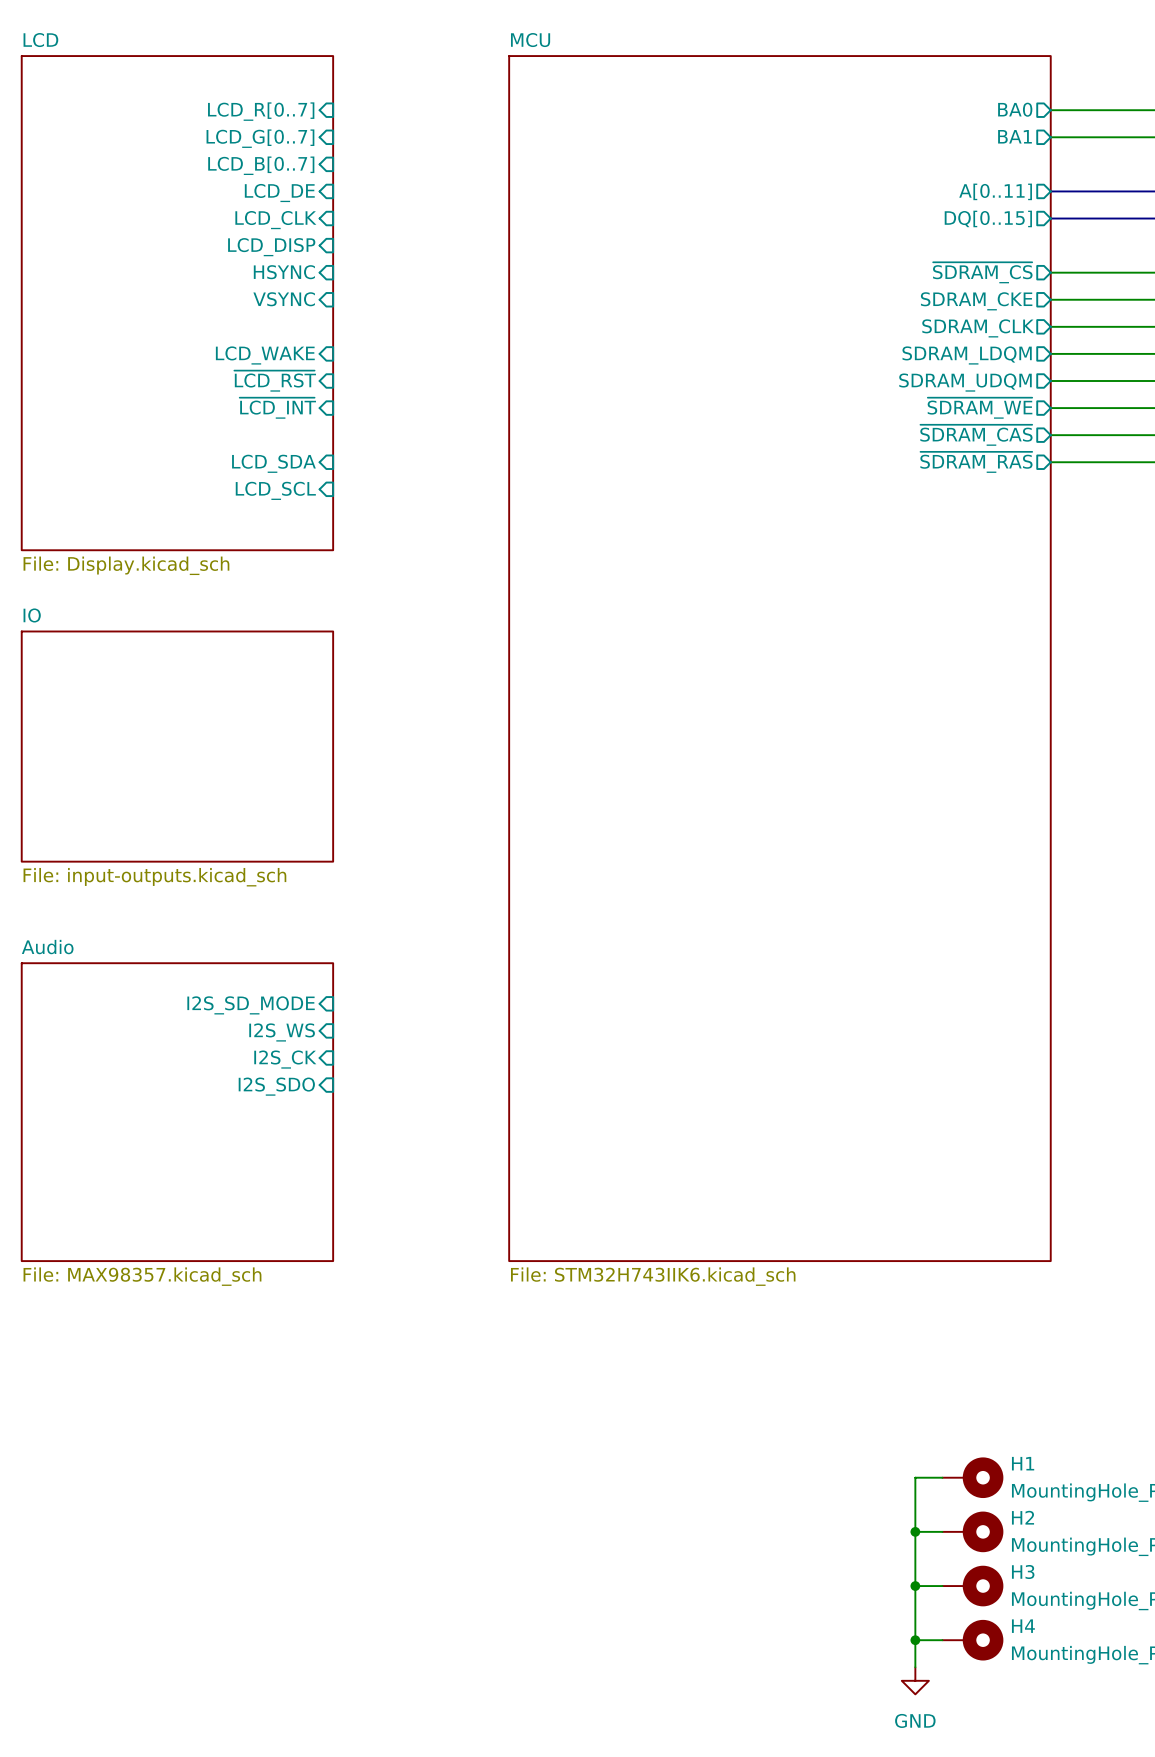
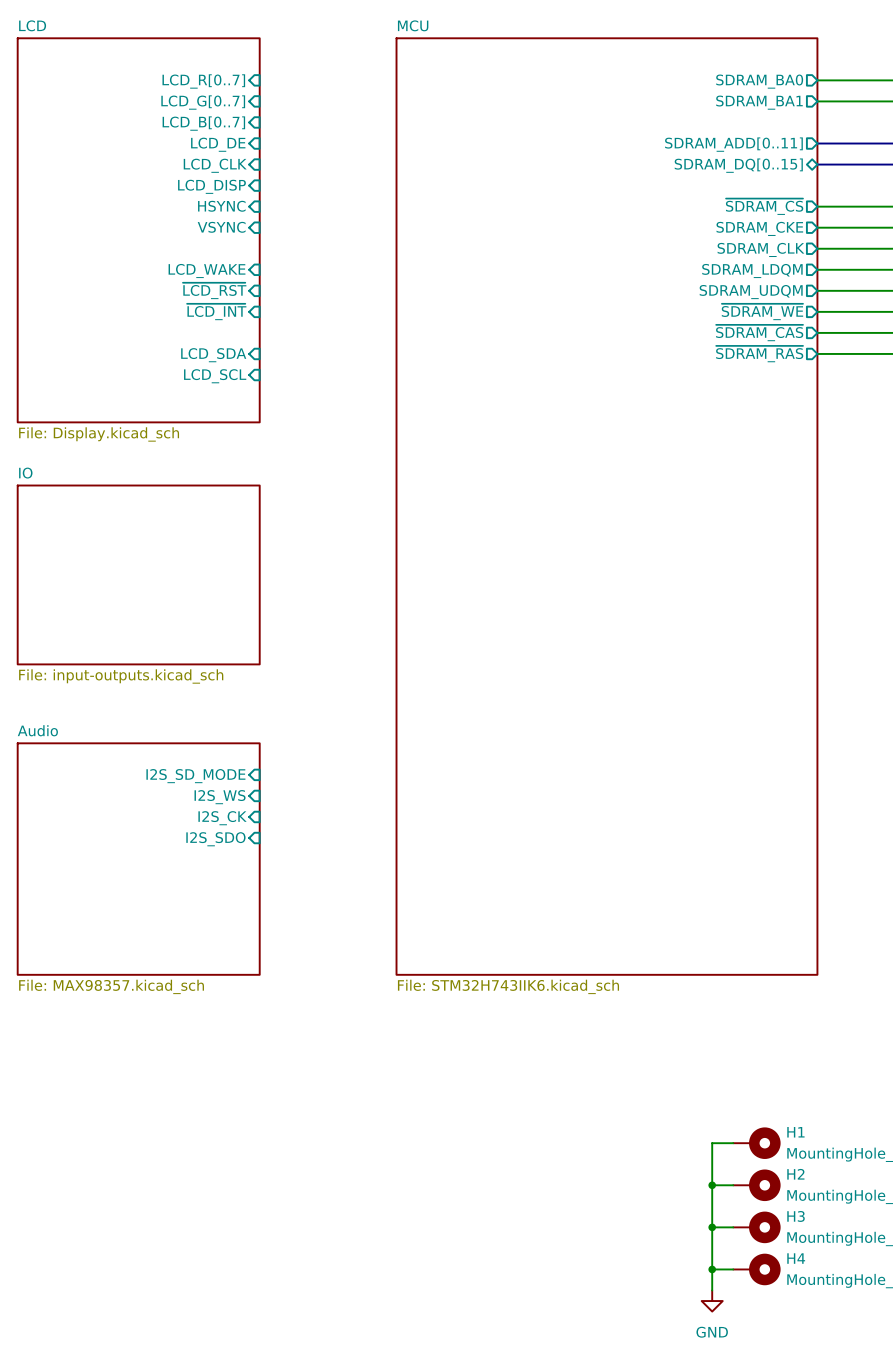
sheet pin: BA0 (1015, 109) -> SDRAM_BA0 (759, 81)
sheet pin: BA1 (1014, 136) -> SDRAM_BA1 (759, 102)
sheet pin: A[0..11] (995, 191) -> SDRAM_ADD[0..11] (733, 144)
sheet pin shape: output (988, 218) -> bidirectional (738, 165)
sheet pin: DQ[0..15] (988, 218) -> SDRAM_DQ[0..15] (738, 165)

